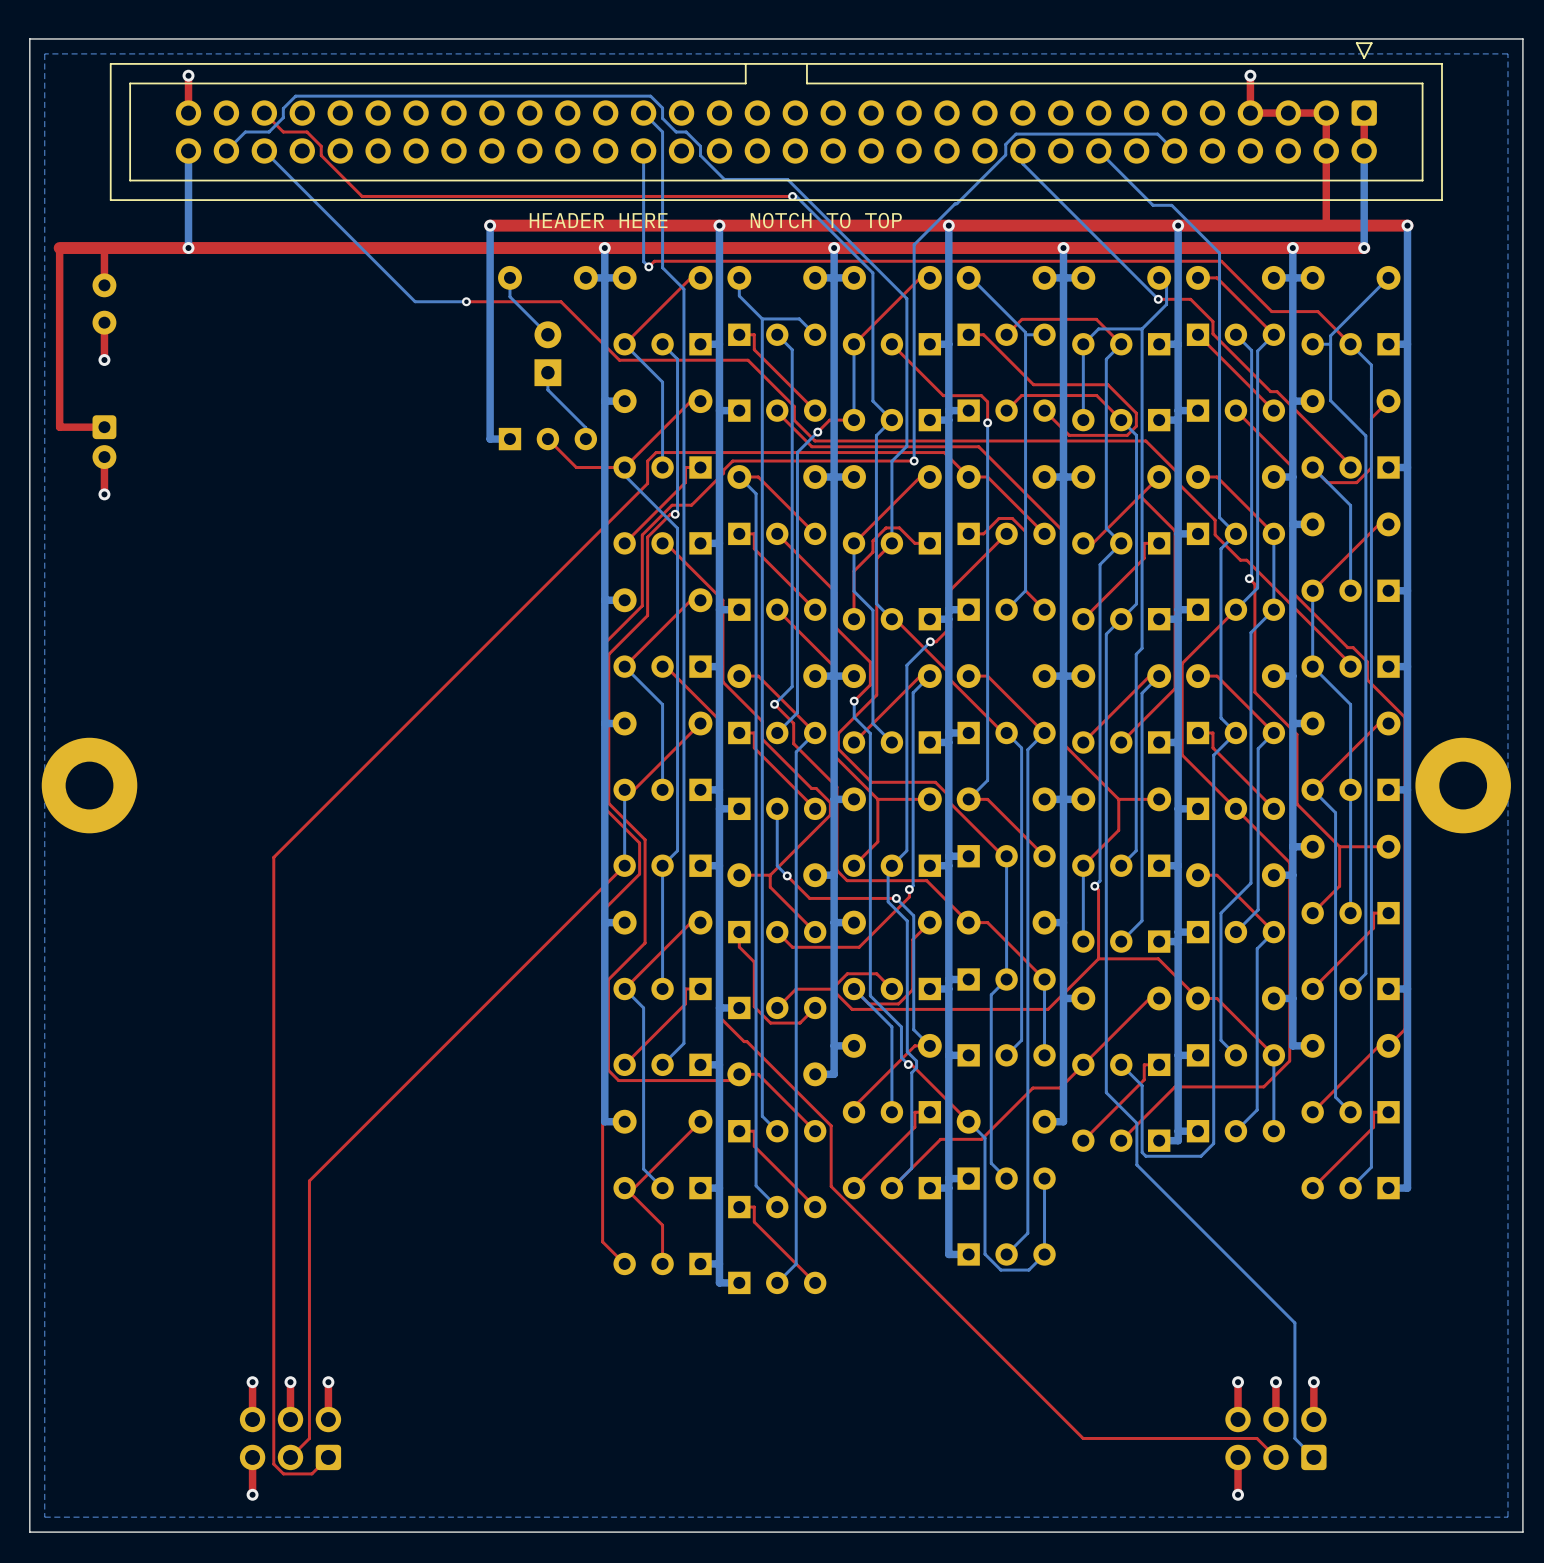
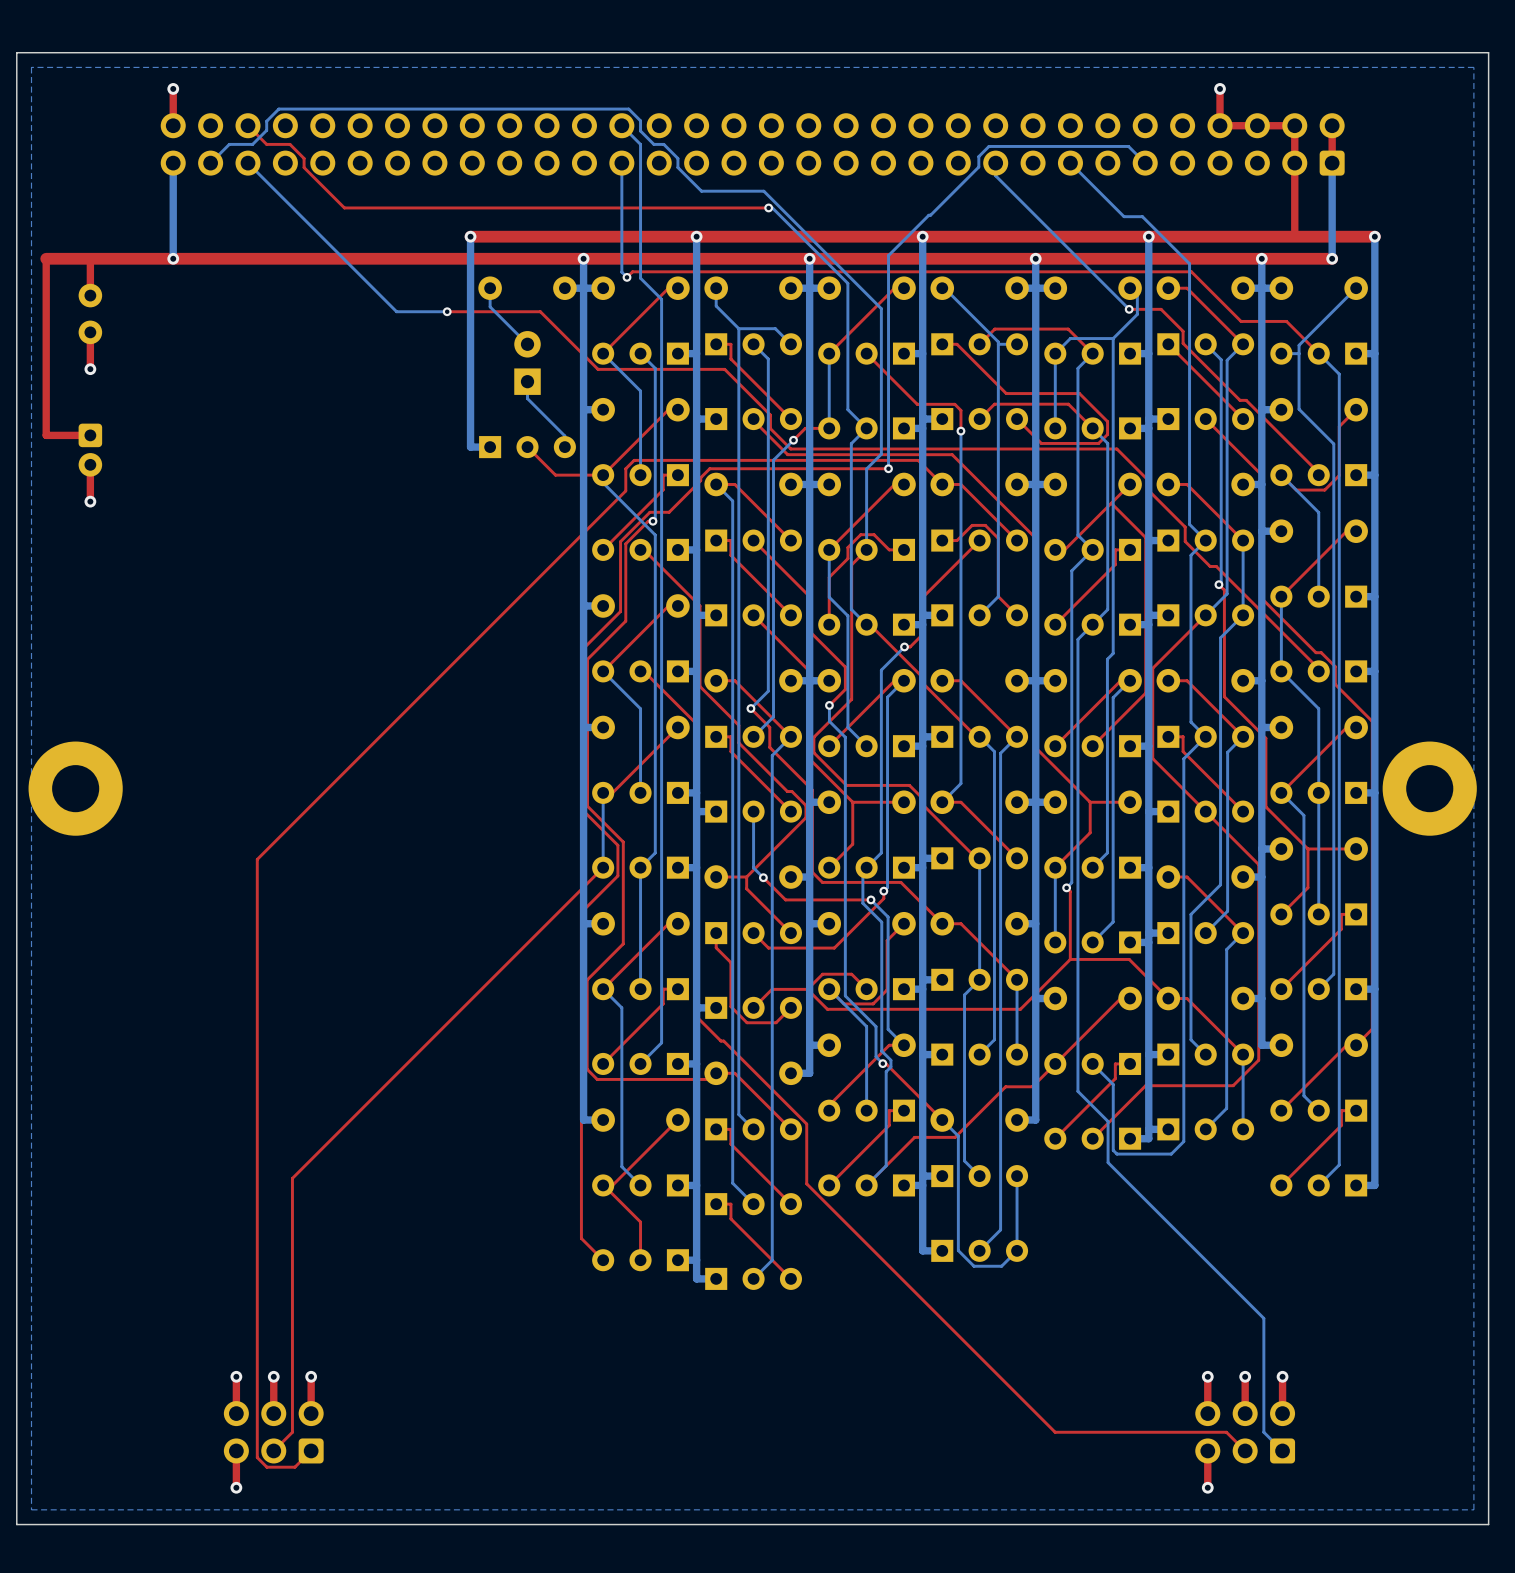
part side: bottom (776, 121) -> top (752, 144)
text: HEADER HERE (598, 220) -> none
text: NOTCH TO TOP (826, 220) -> none

